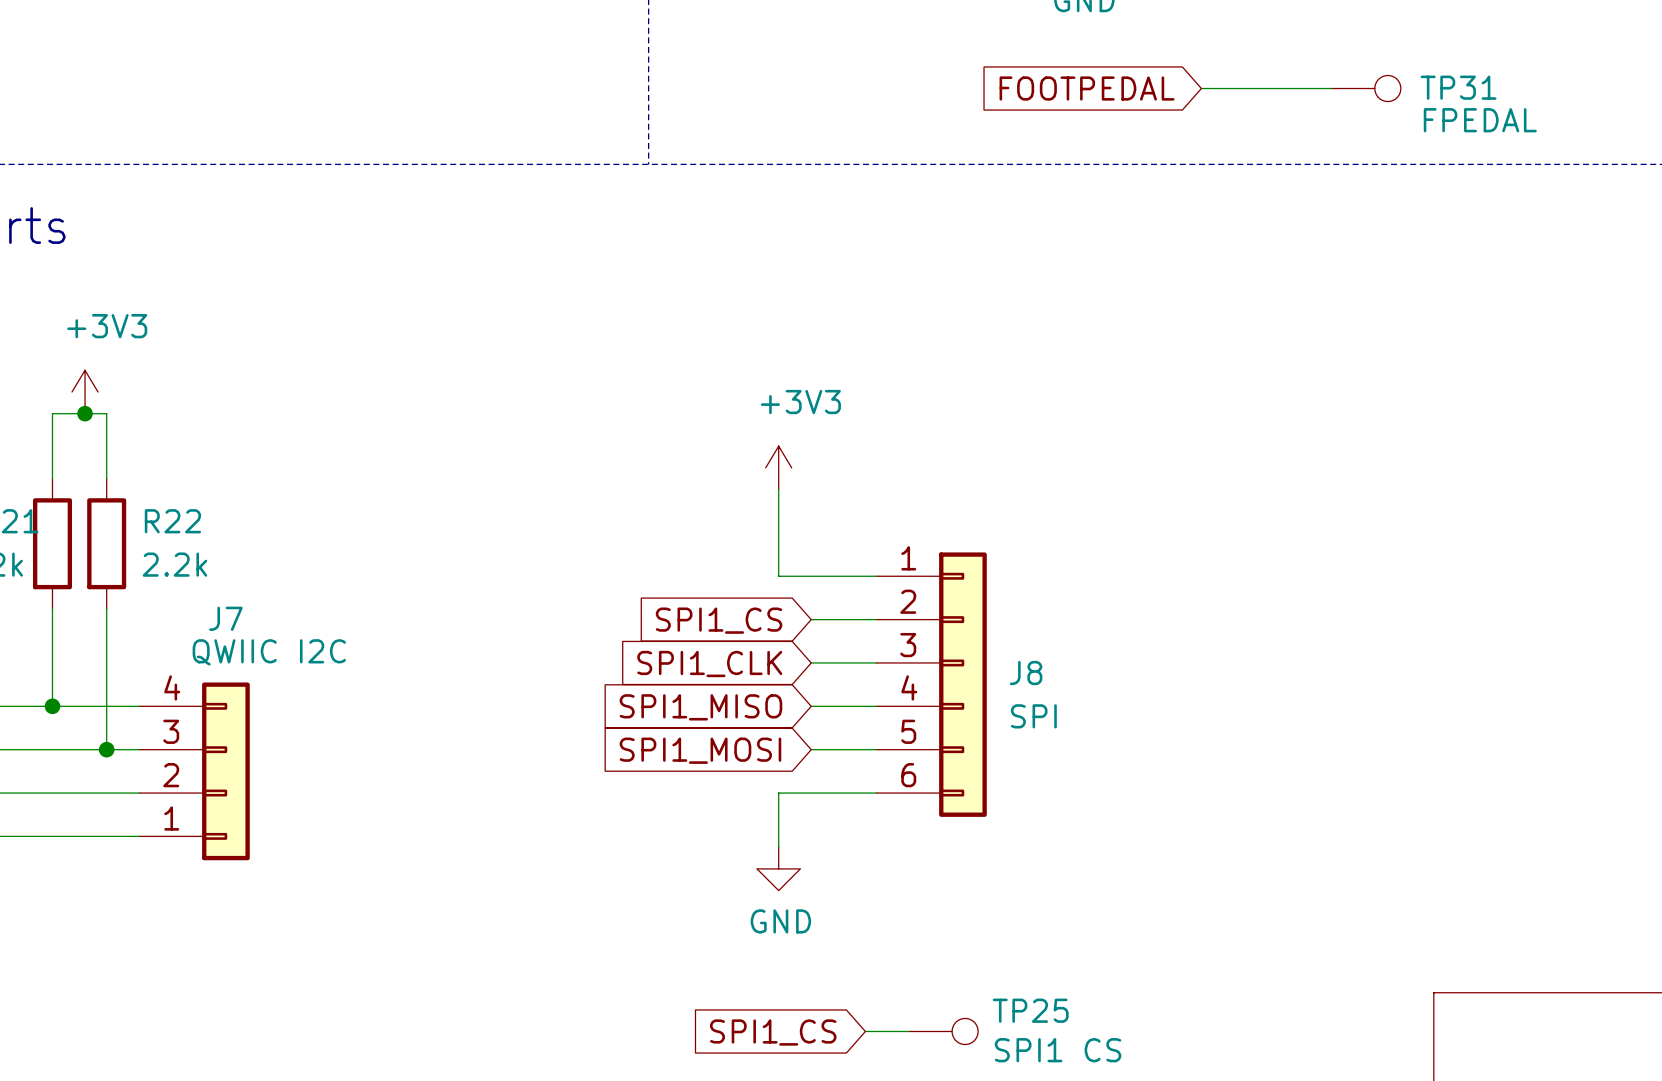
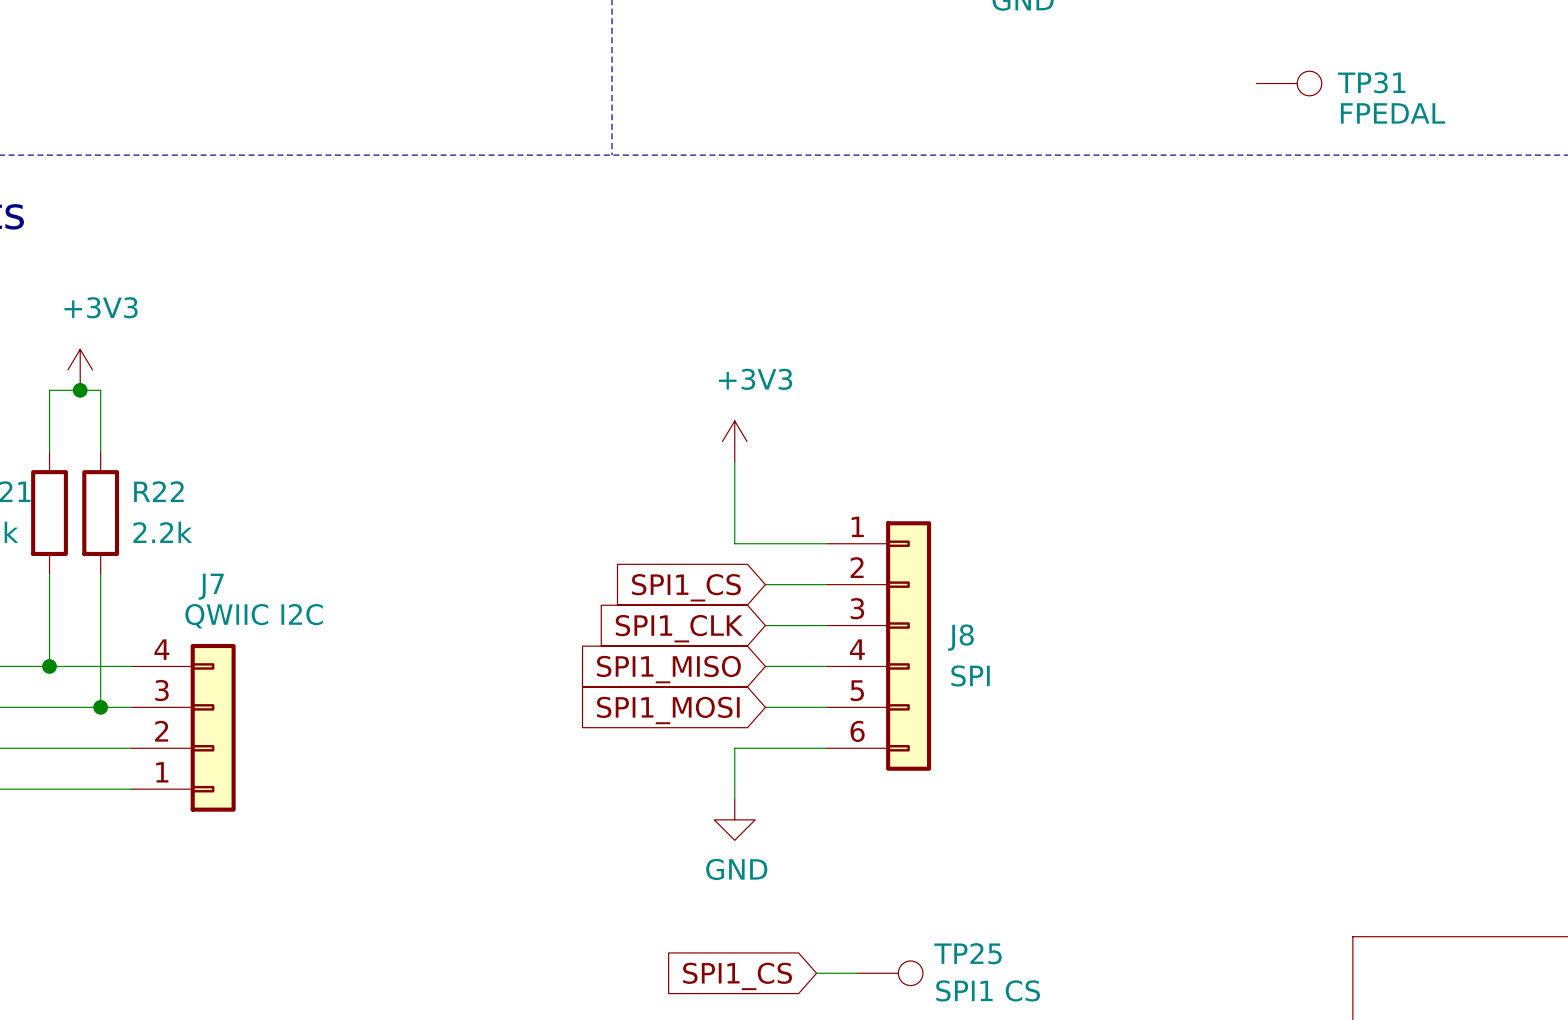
global label: FOOTPEDAL (1087, 88) -> none
wire: (1201, 88) (1331, 88) -> none

